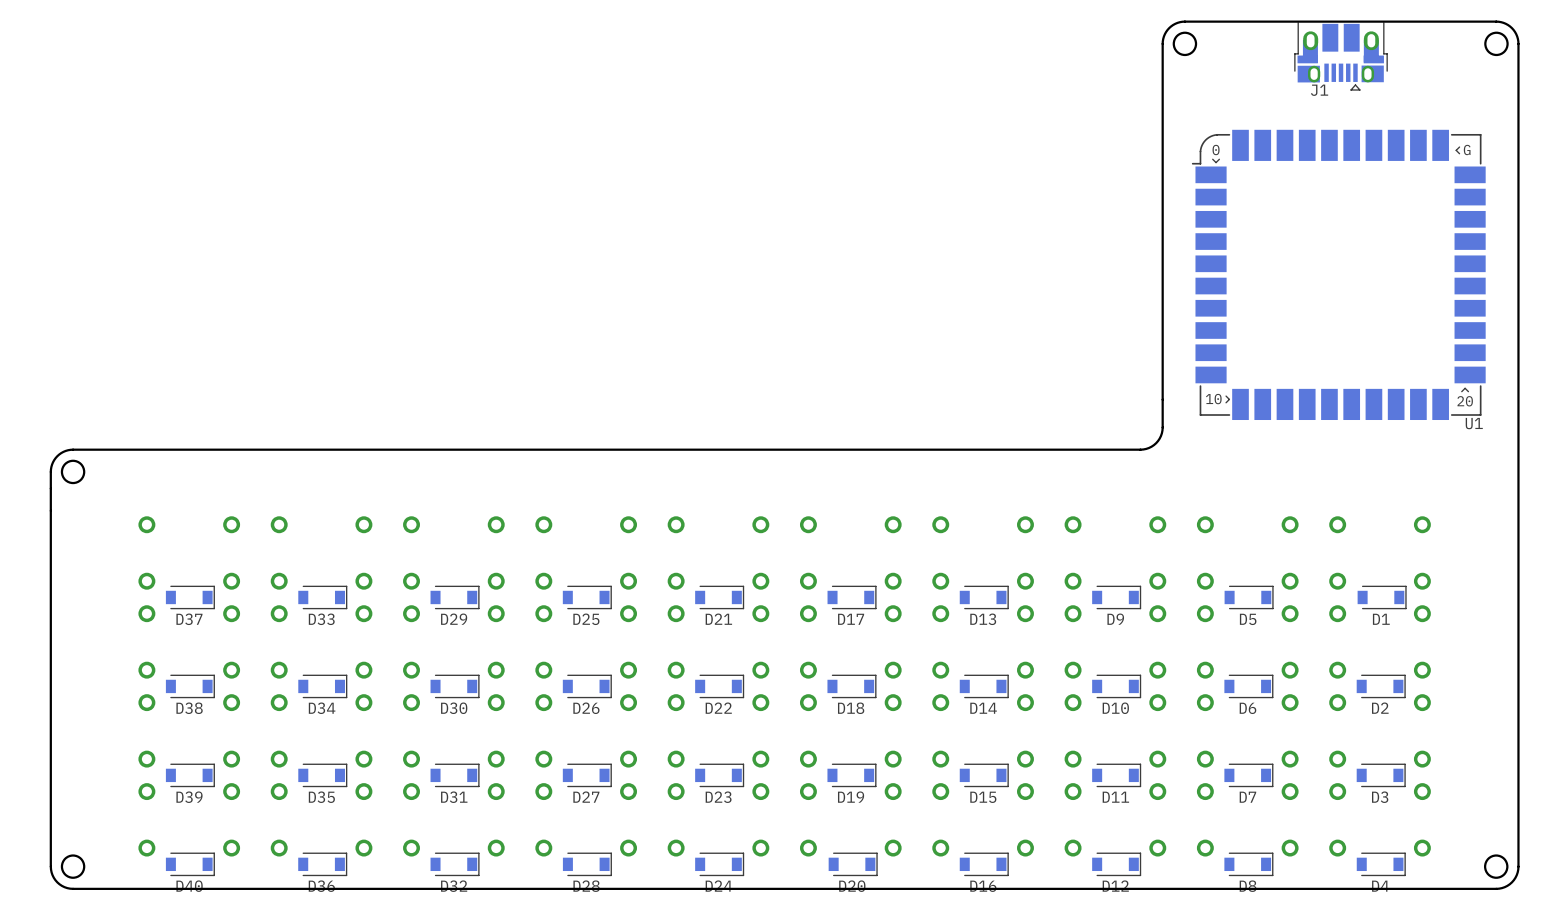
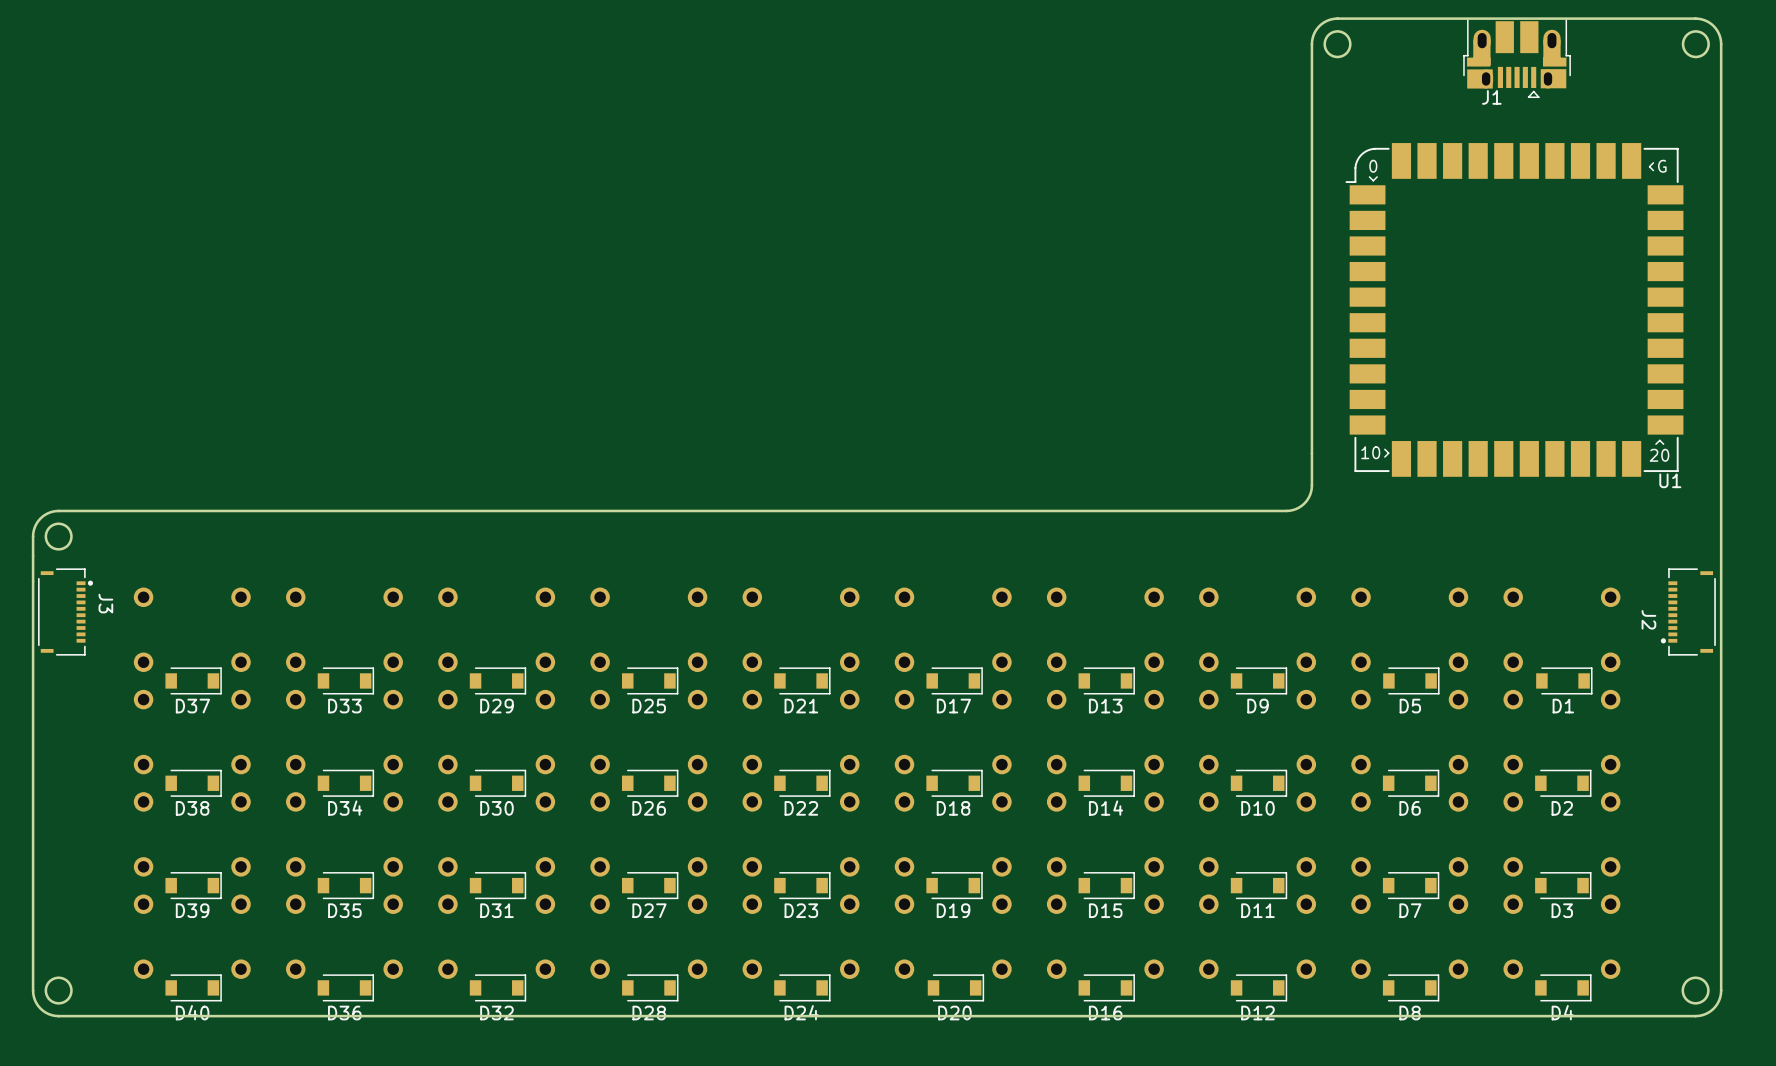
J3: none -> (65, 612)
J2: none -> (1688, 612)

